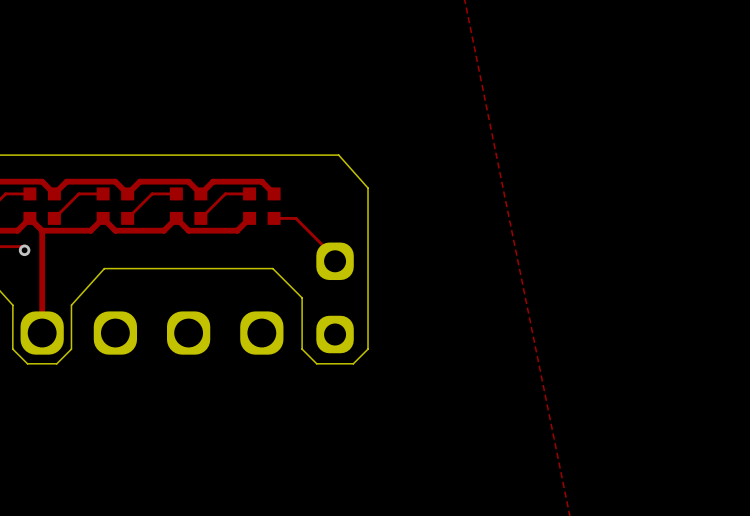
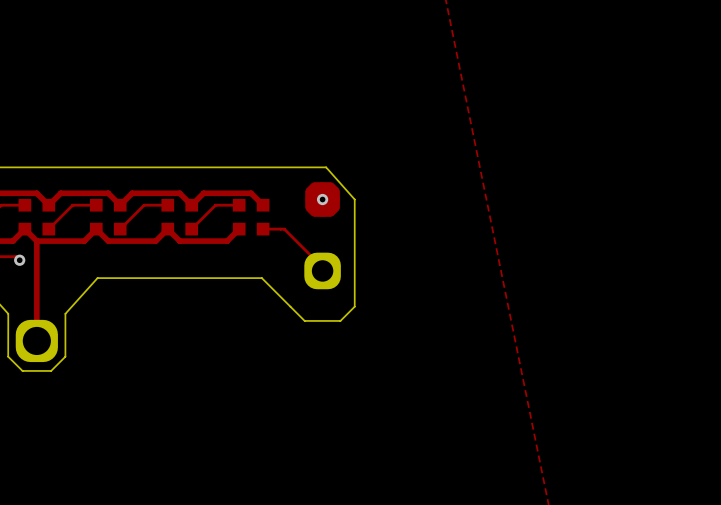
part: none -> (322, 199)
via: none -> (322, 199)
board edge: (302, 297) (302, 349) (316, 363) (353, 363) (368, 349) (368, 297) -> (290, 306) (304, 320) (340, 320) (354, 306)
part: (115, 333) -> none
part: (188, 333) -> none
part: (261, 333) -> none
part: (335, 334) -> none

